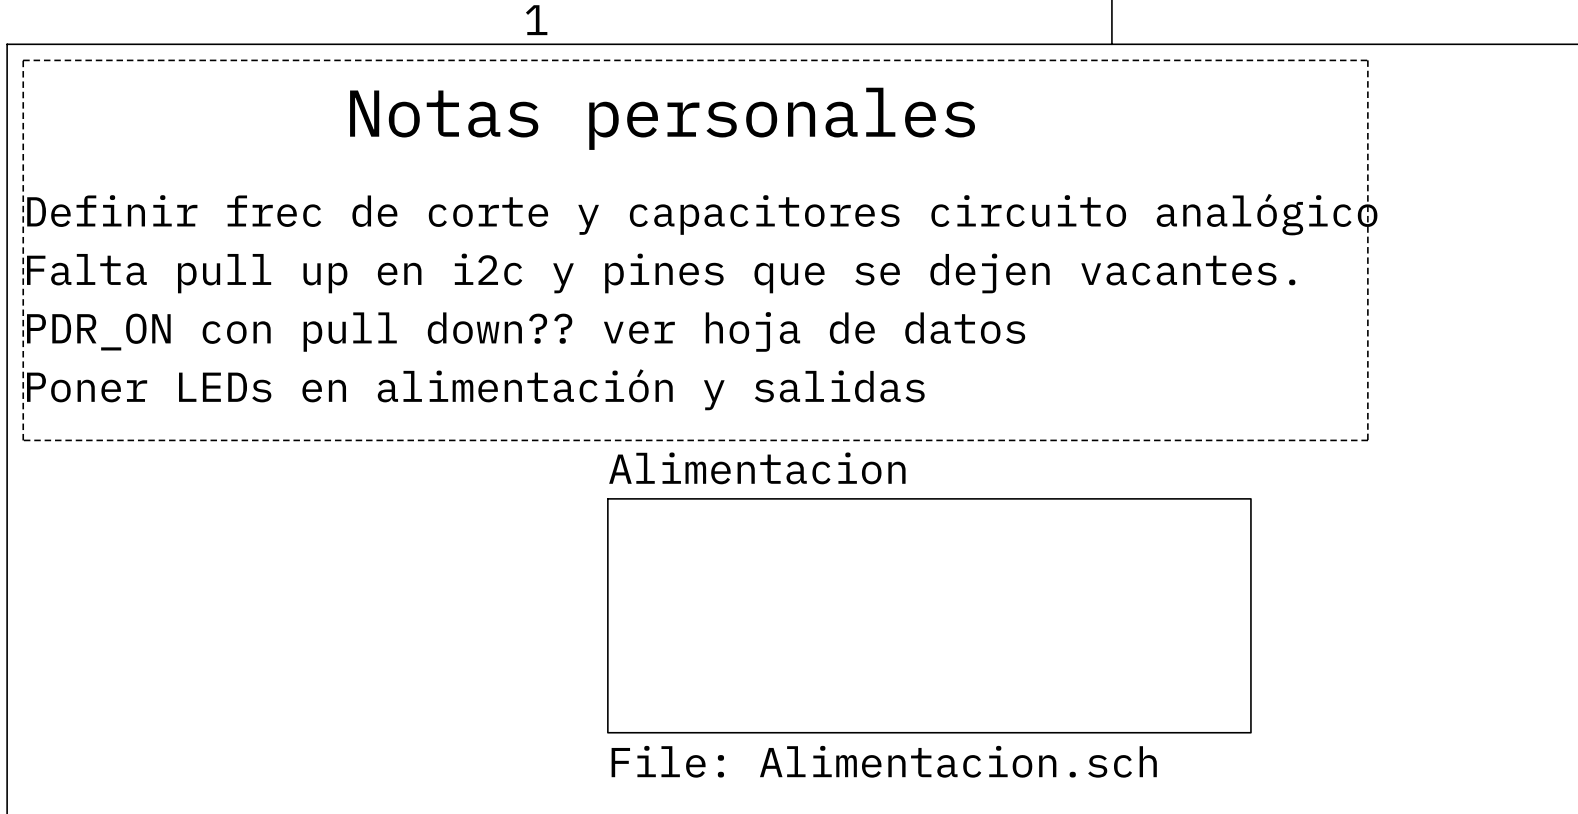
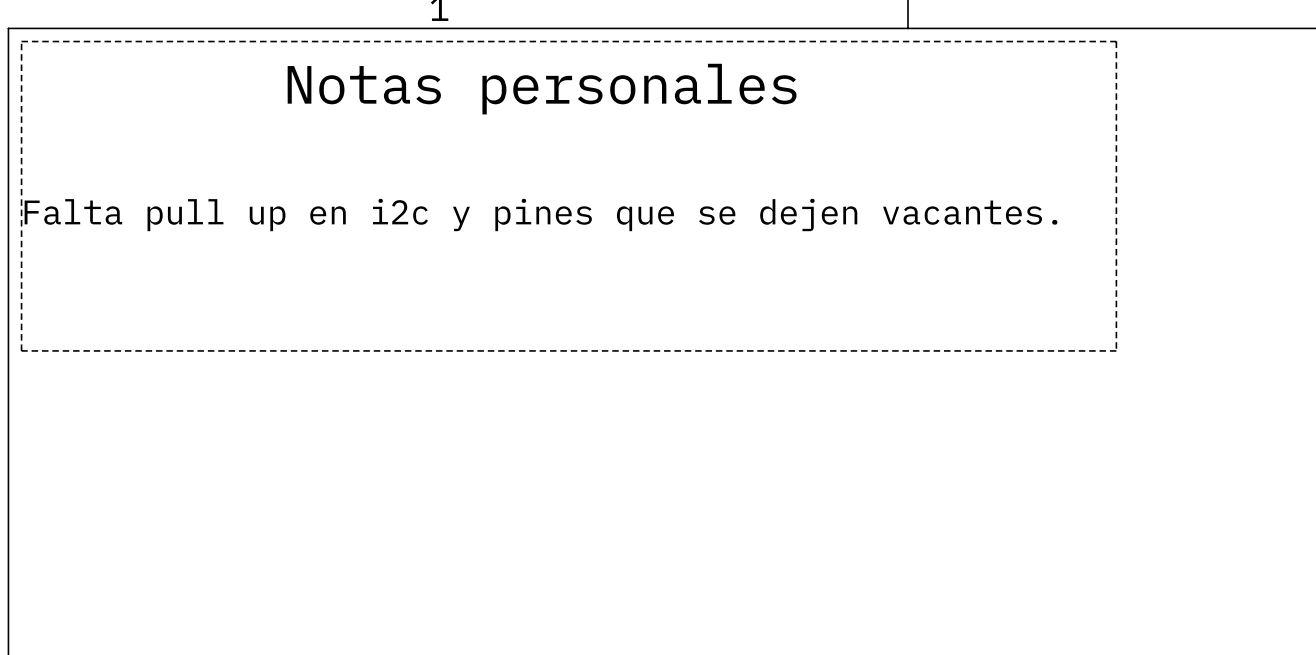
text: Definir frec de corte y capacitores circuito analógico (702, 214) -> none
text: PDR_ON con pull down?? ver hoja de datos (526, 331) -> none
text: Poner LEDs en alimentación y salidas (475, 389) -> none
sheet Alimentacion: File: Alimentacion.sch (929, 615) -> none

